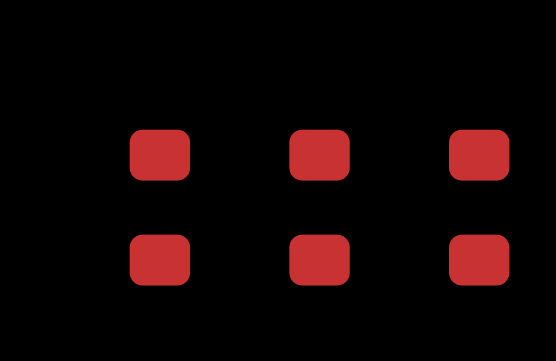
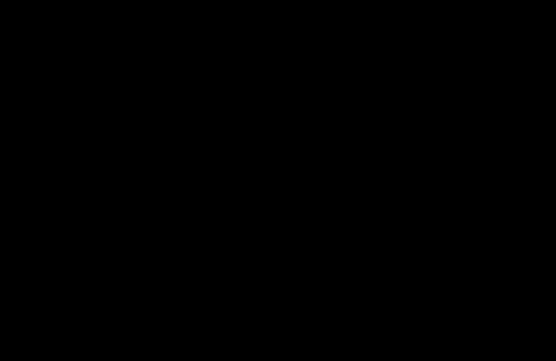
part: (159, 207) -> none
part: (319, 207) -> none
part: (479, 207) -> none

